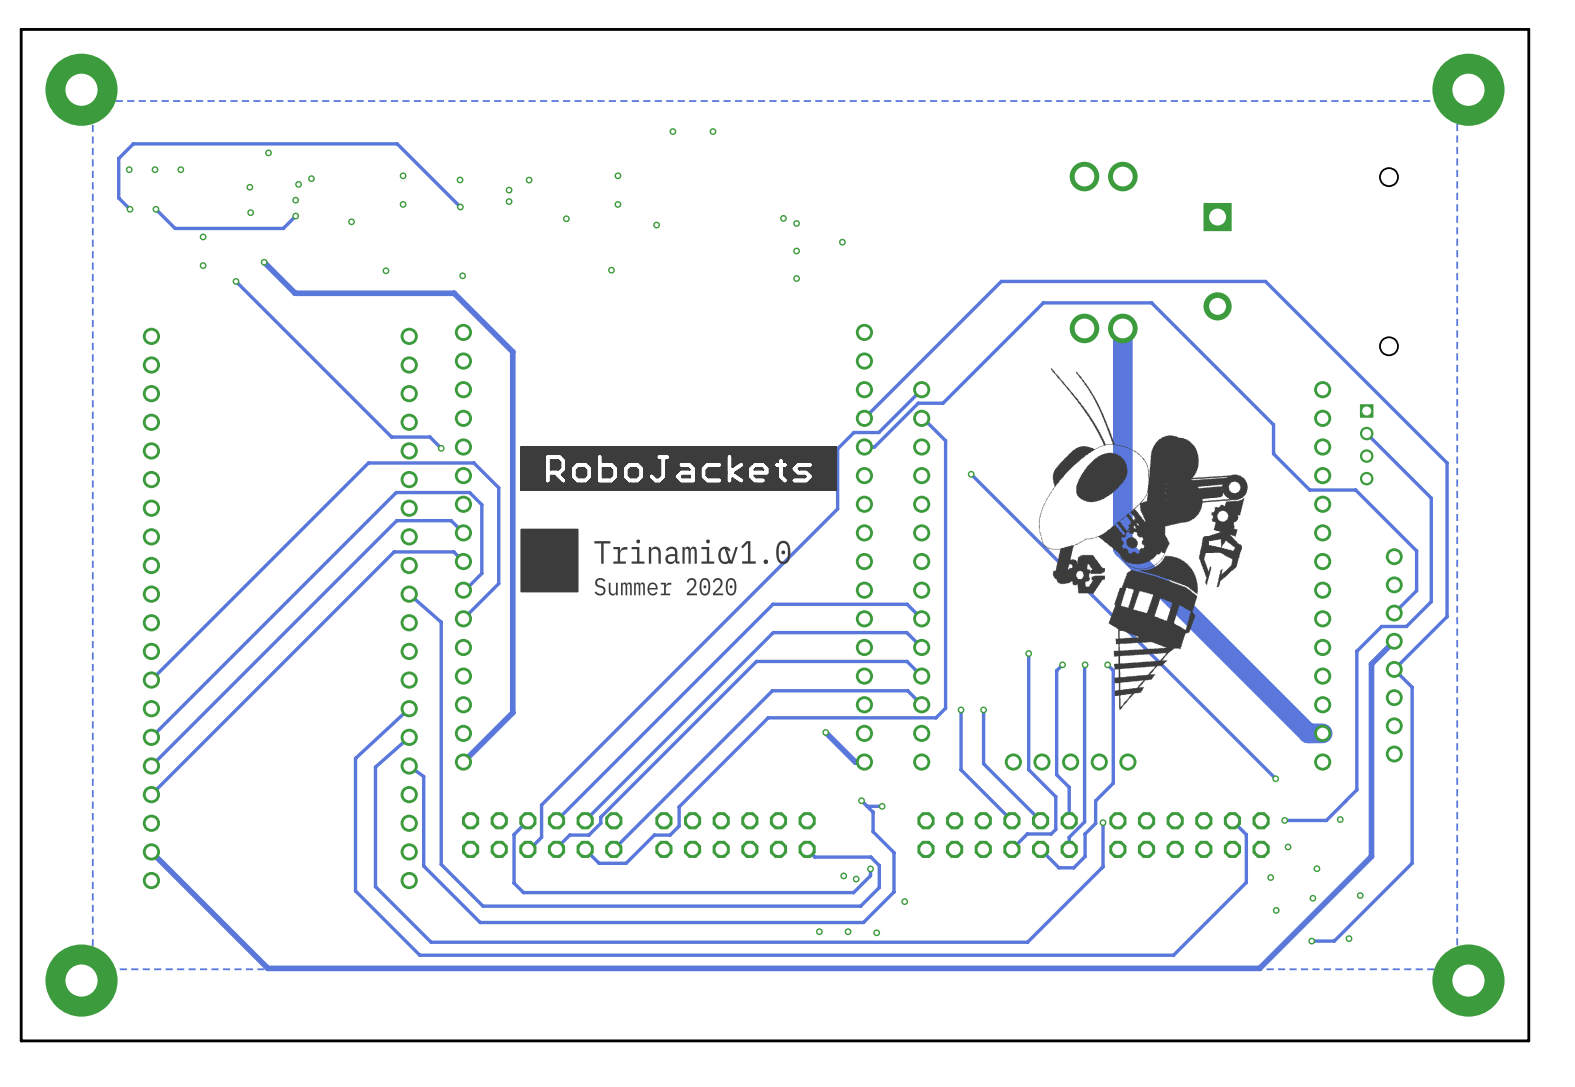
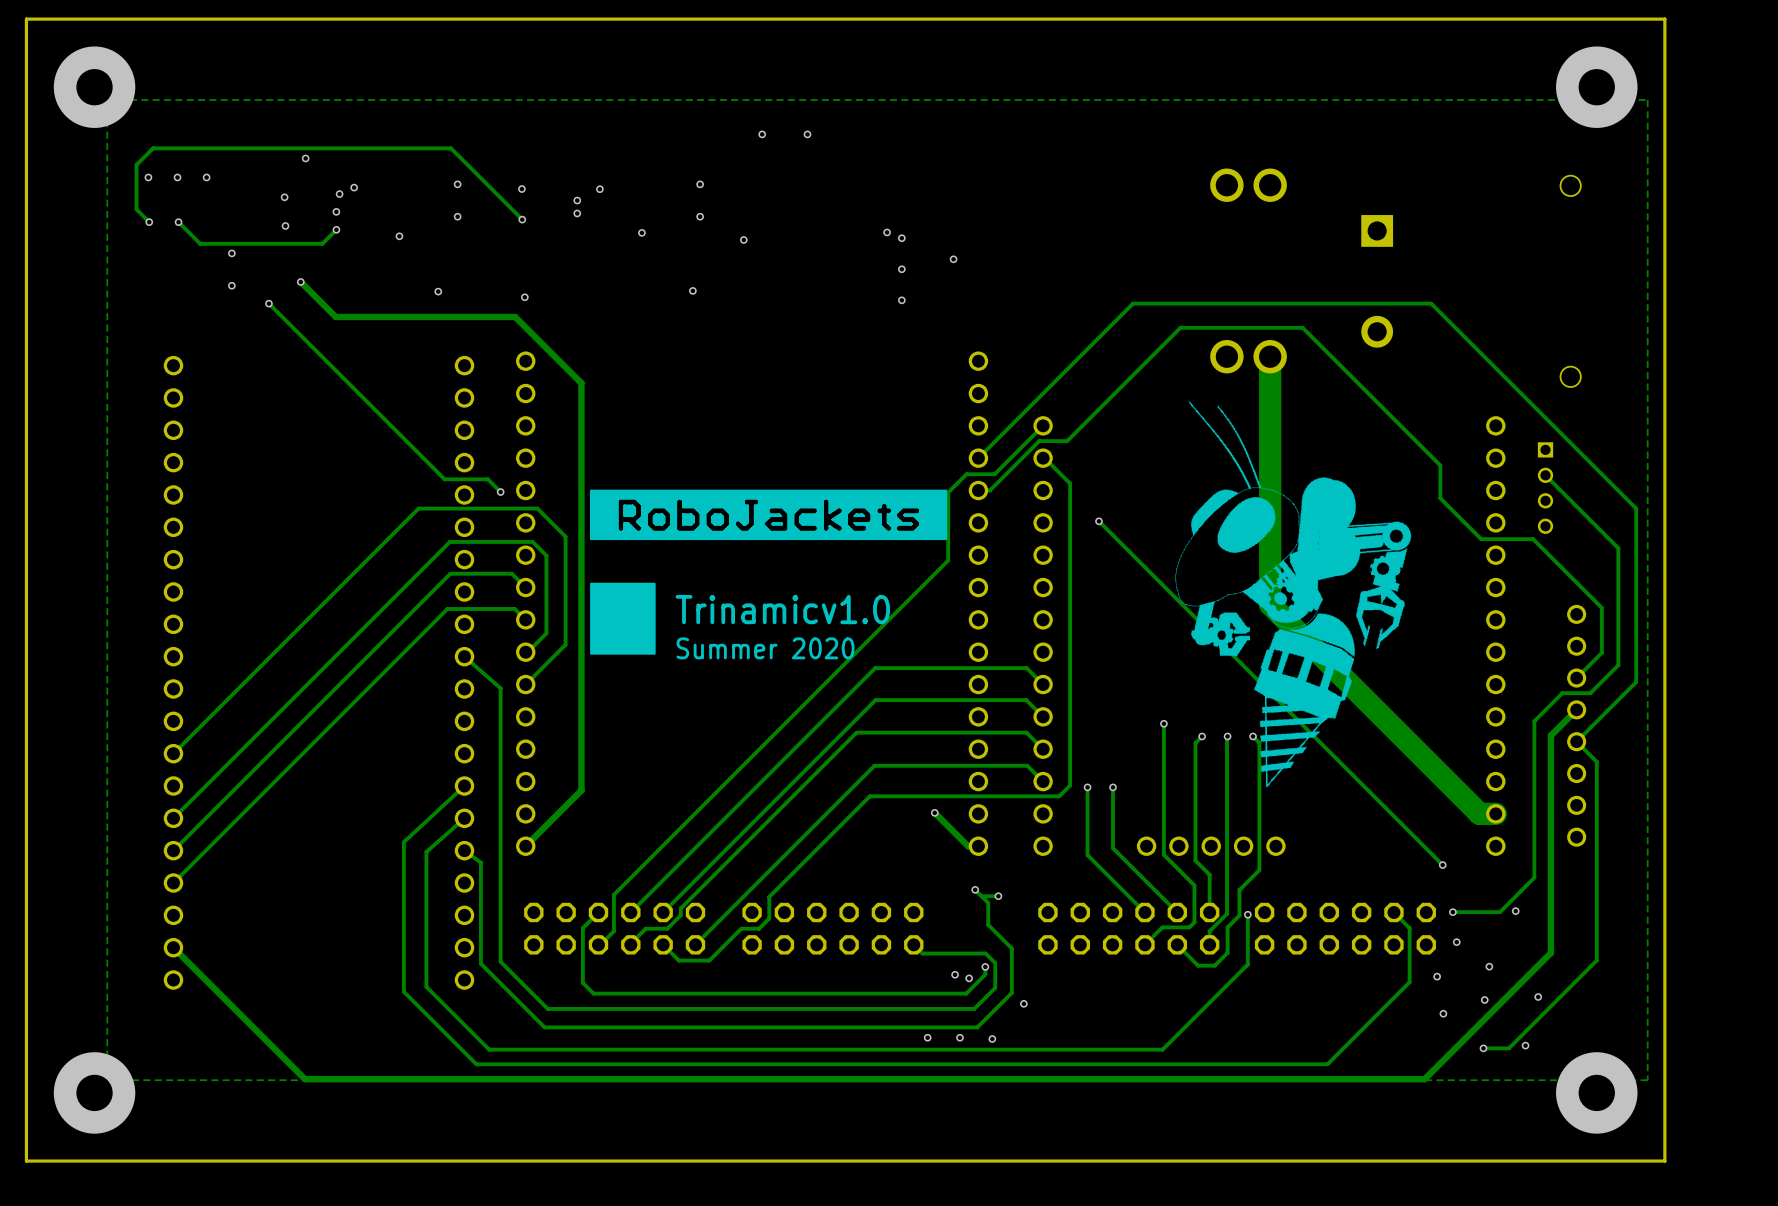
board edge: (1472, 29) (1528, 29) (1528, 1040) (1472, 1040) -> (1664, 19) (1664, 1161)
via position: (1468, 89) -> (1596, 87)
via position: (1468, 980) -> (1596, 1092)

